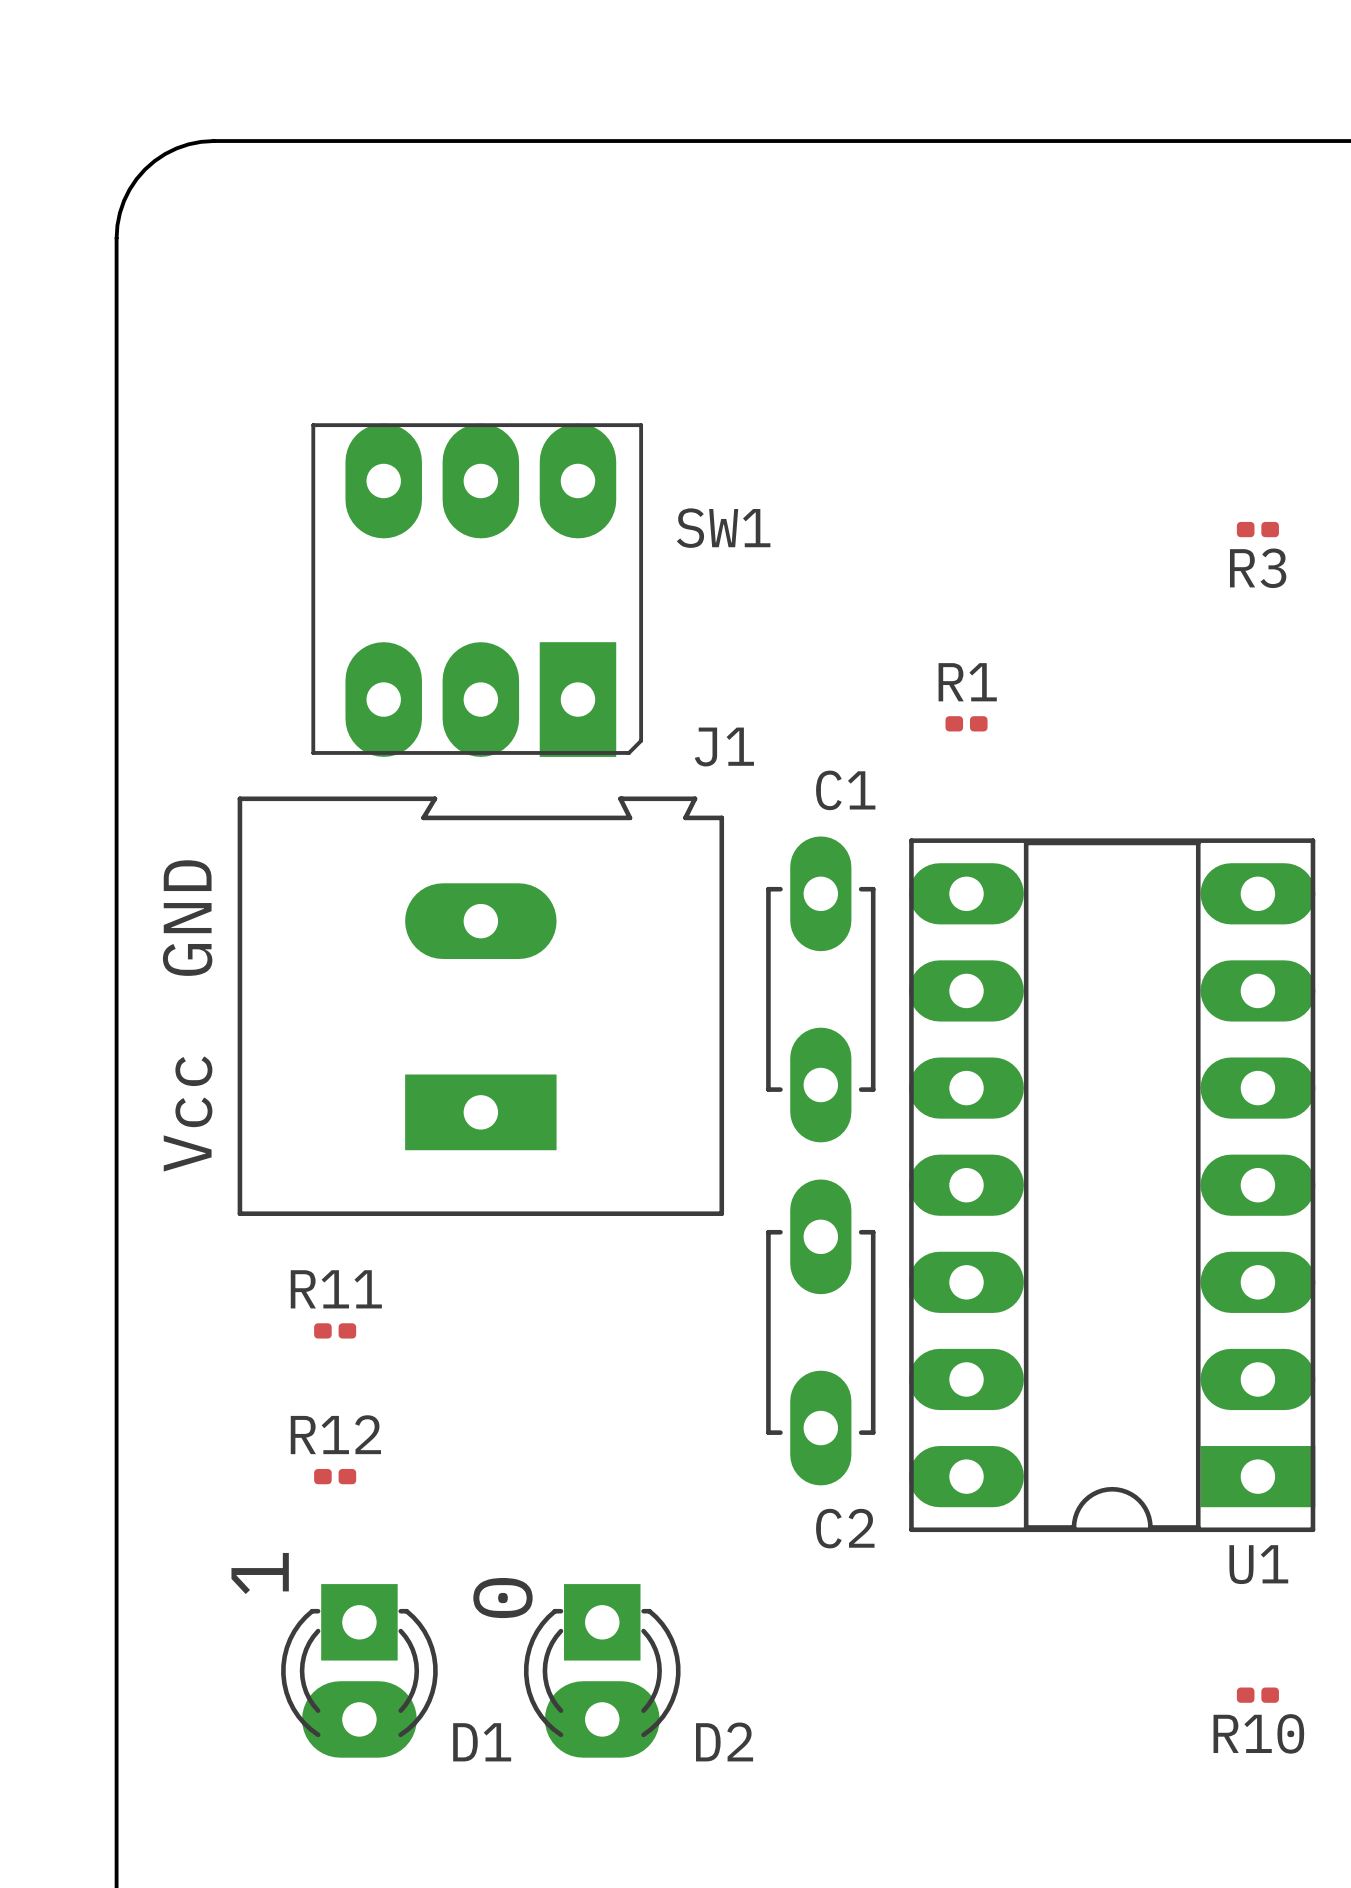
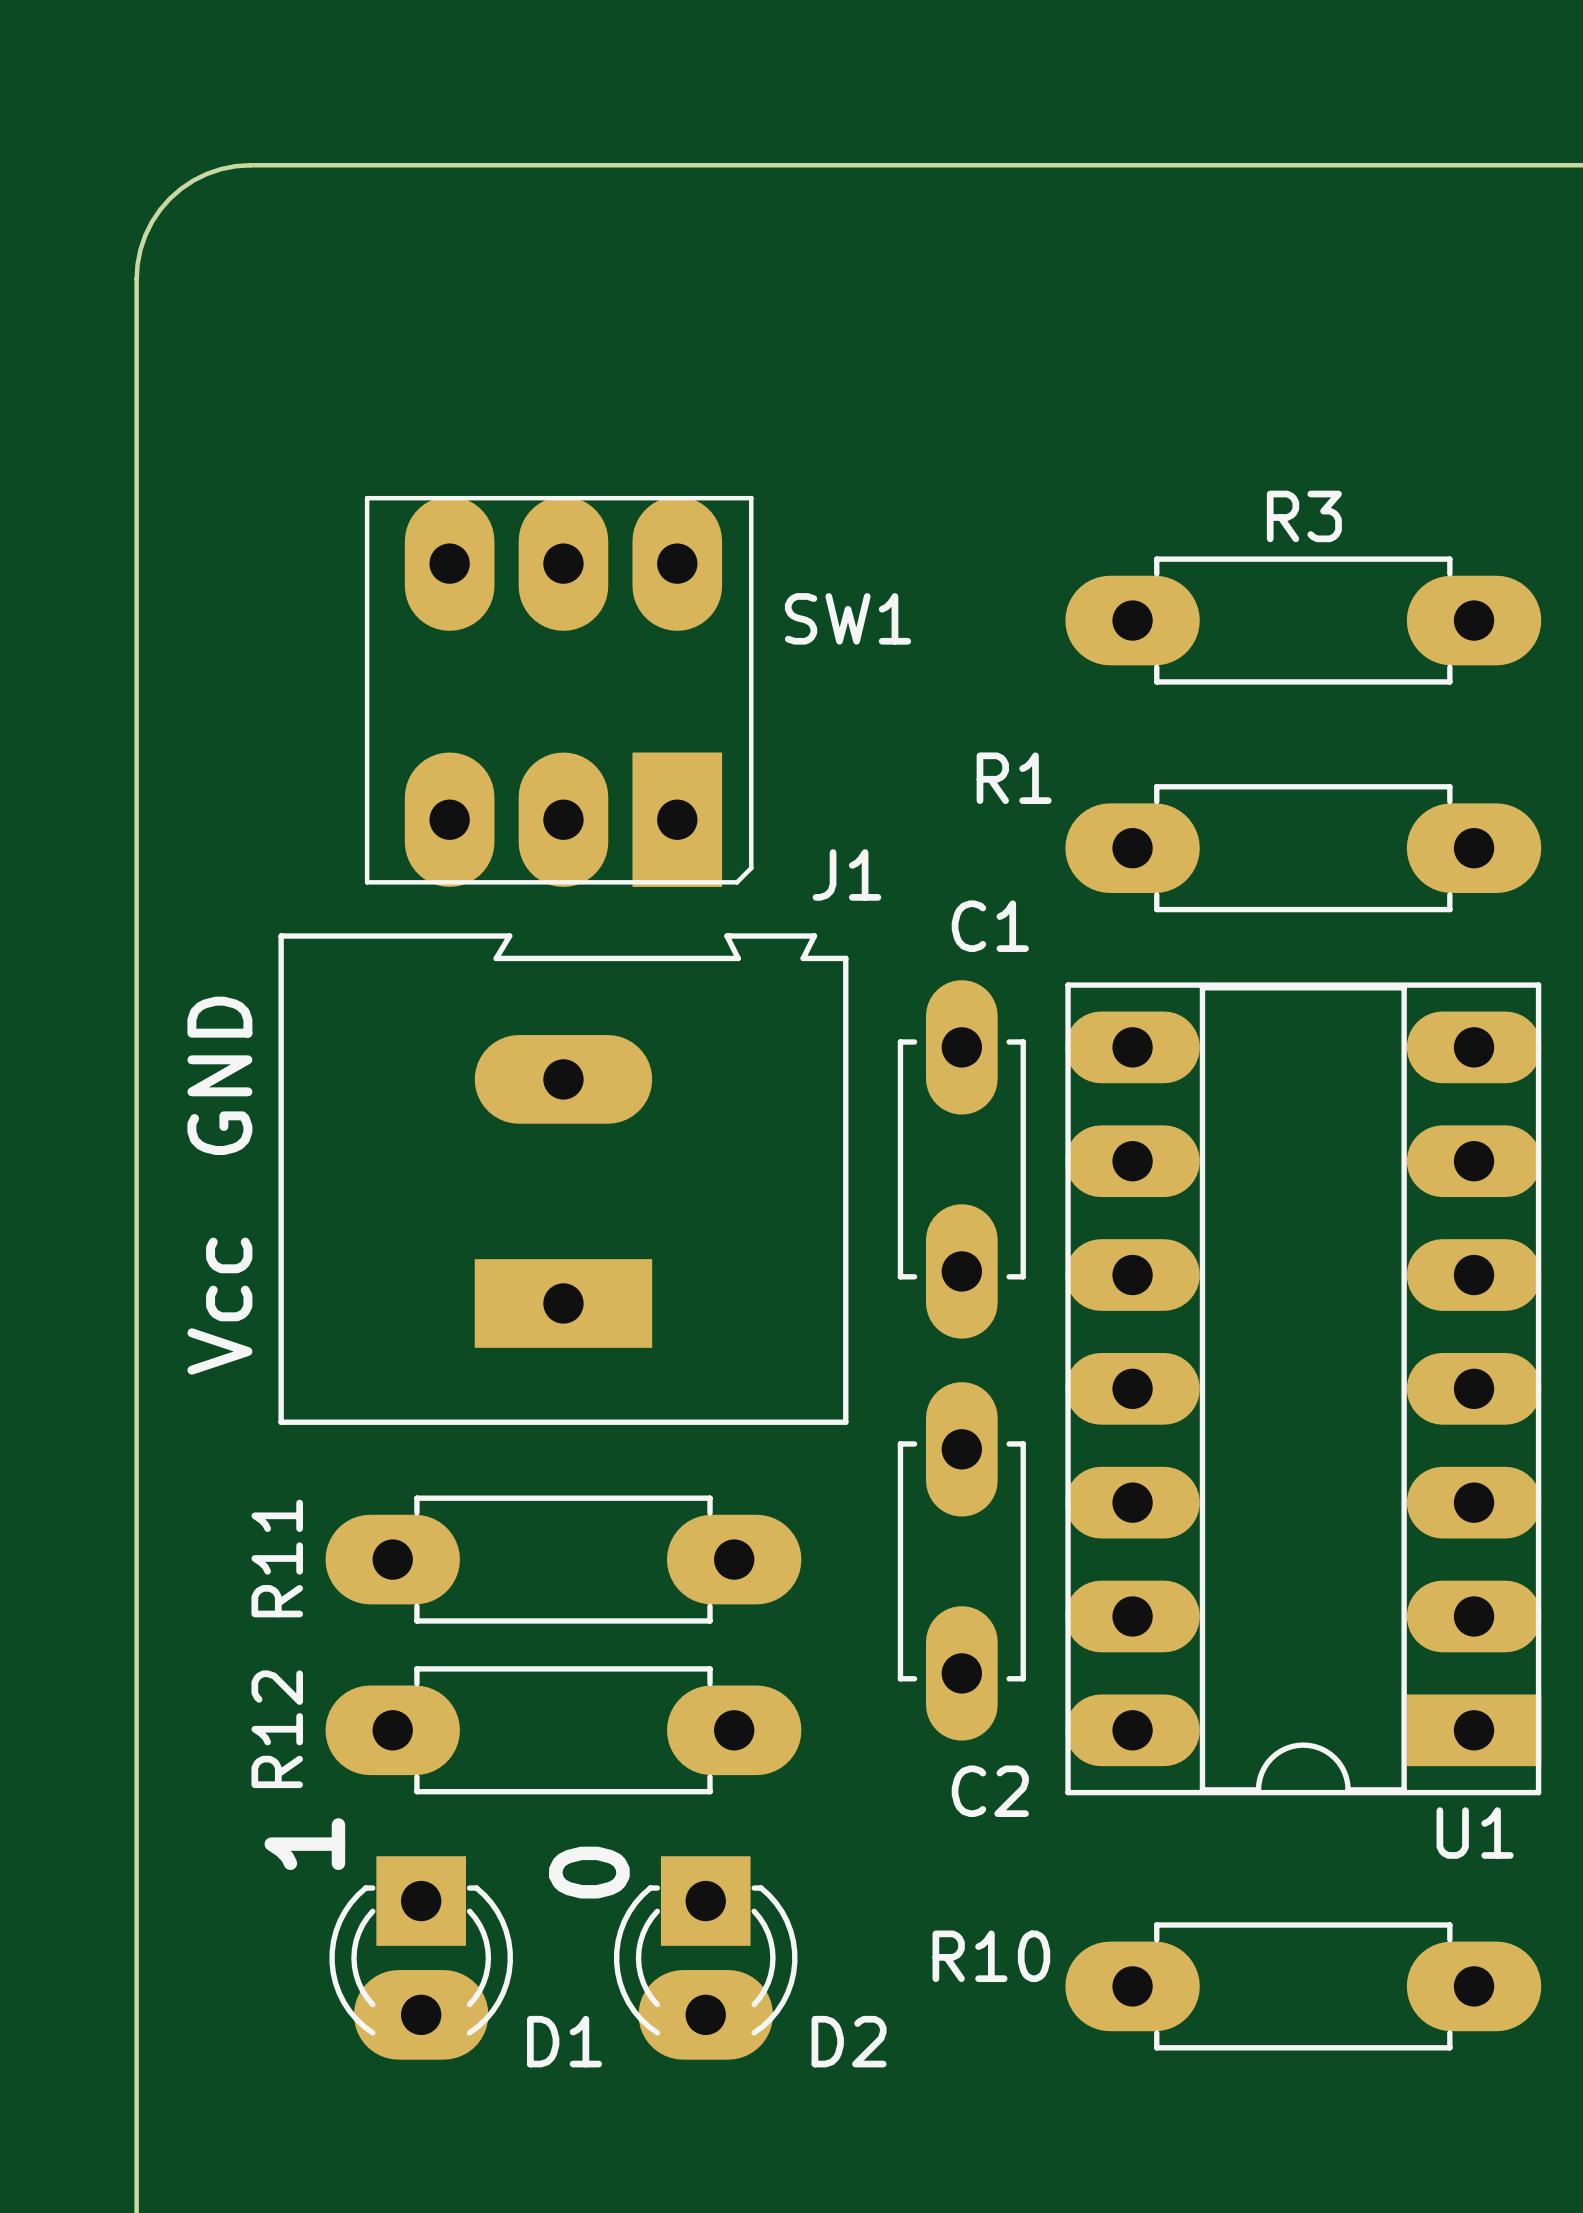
R3 footprint: [1236, 521, 1279, 538] -> [1065, 556, 1542, 685]
R3 name position: R3 (1258, 568) -> R3 (1304, 516)
R1 name position: R1 (967, 682) -> R1 (1014, 778)
R1 footprint: [945, 716, 988, 732] -> [1065, 784, 1542, 913]
R11 name position: R11 (336, 1289) -> R11 (277, 1558)
R11 footprint: [314, 1323, 357, 1339] -> [325, 1495, 802, 1624]
R12 name position: R12 (335, 1434) -> R12 (277, 1729)
R12 footprint: [314, 1468, 357, 1485] -> [325, 1666, 802, 1795]
R10 footprint: [1236, 1687, 1279, 1703] -> [1065, 1922, 1542, 2051]
R10 name position: R10 (1258, 1733) -> R10 (991, 1956)

